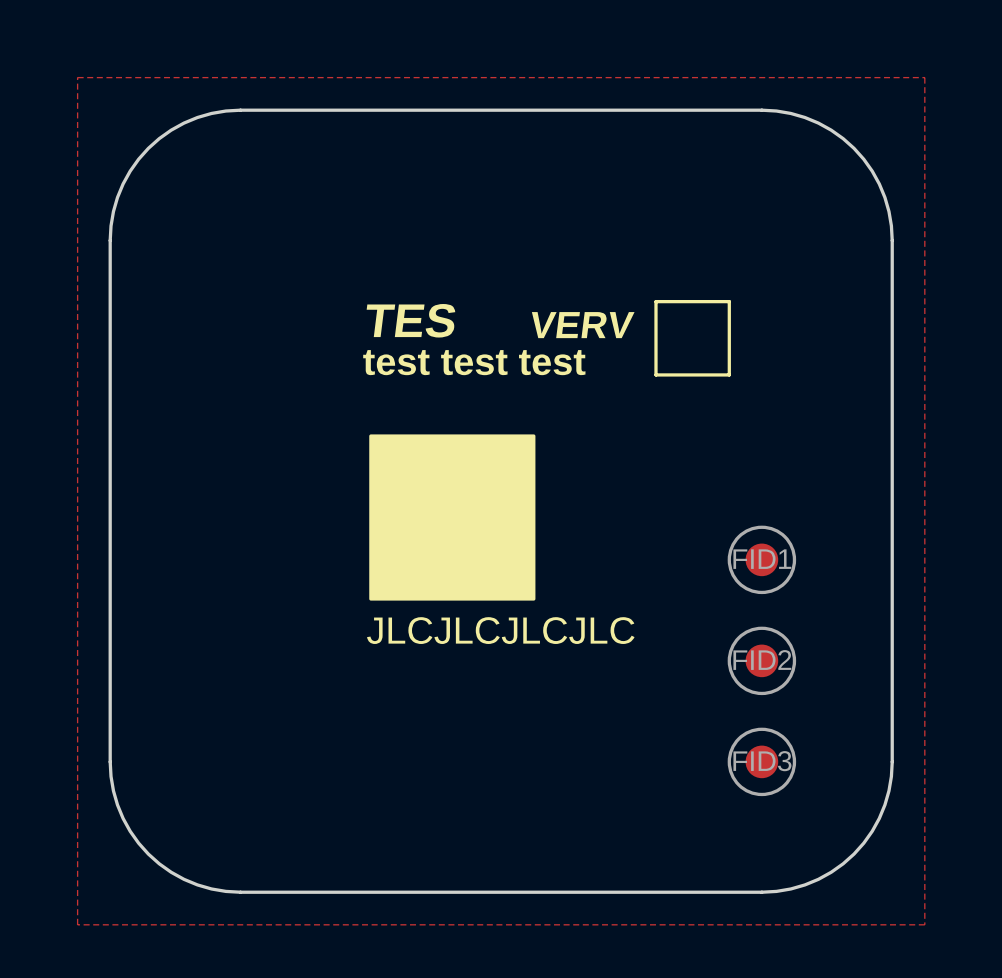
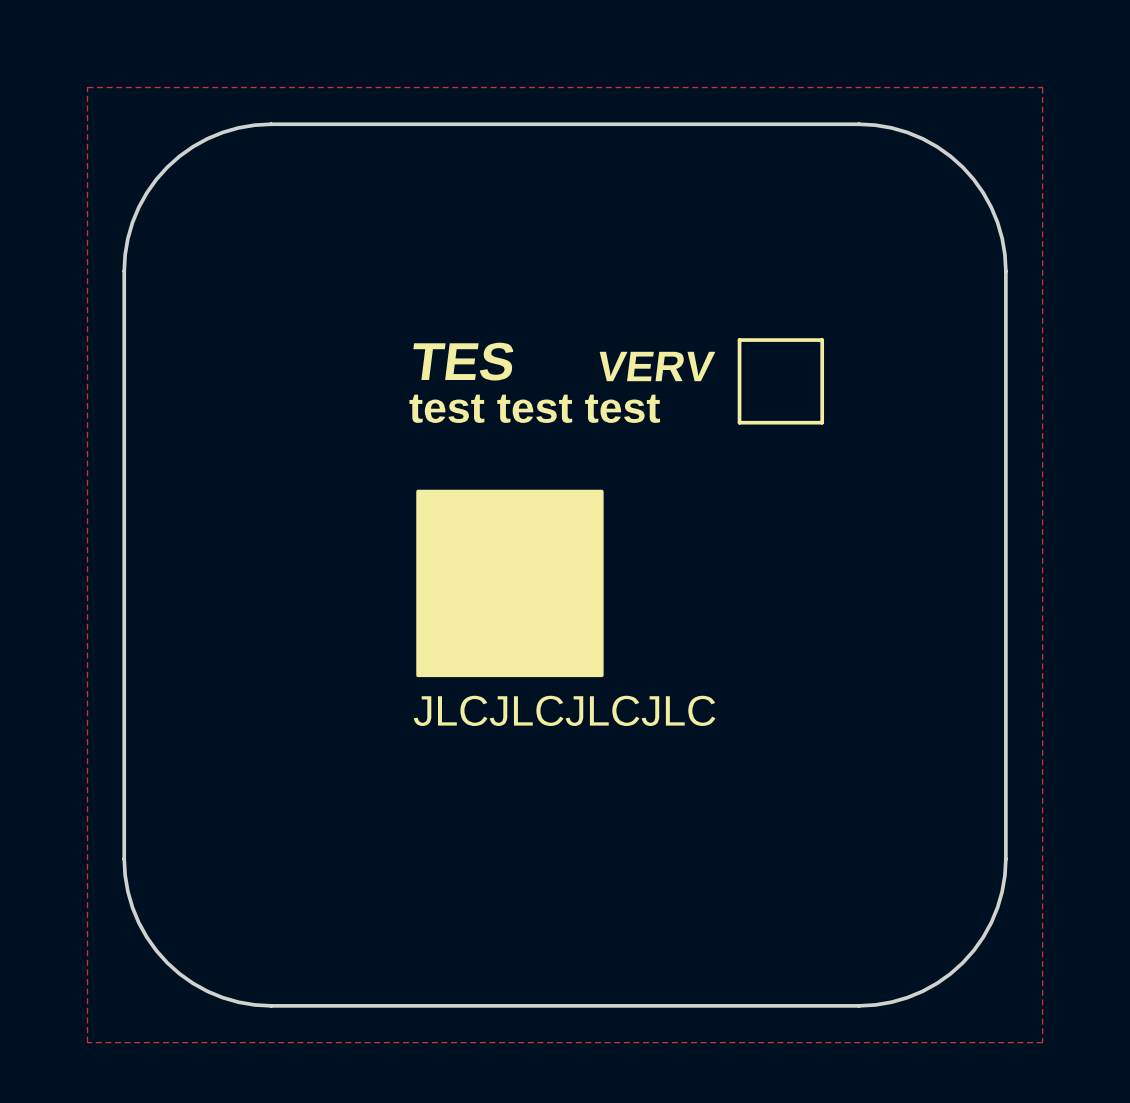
FID1: (761, 559) -> none
FID2: (761, 660) -> none
FID3: (761, 761) -> none

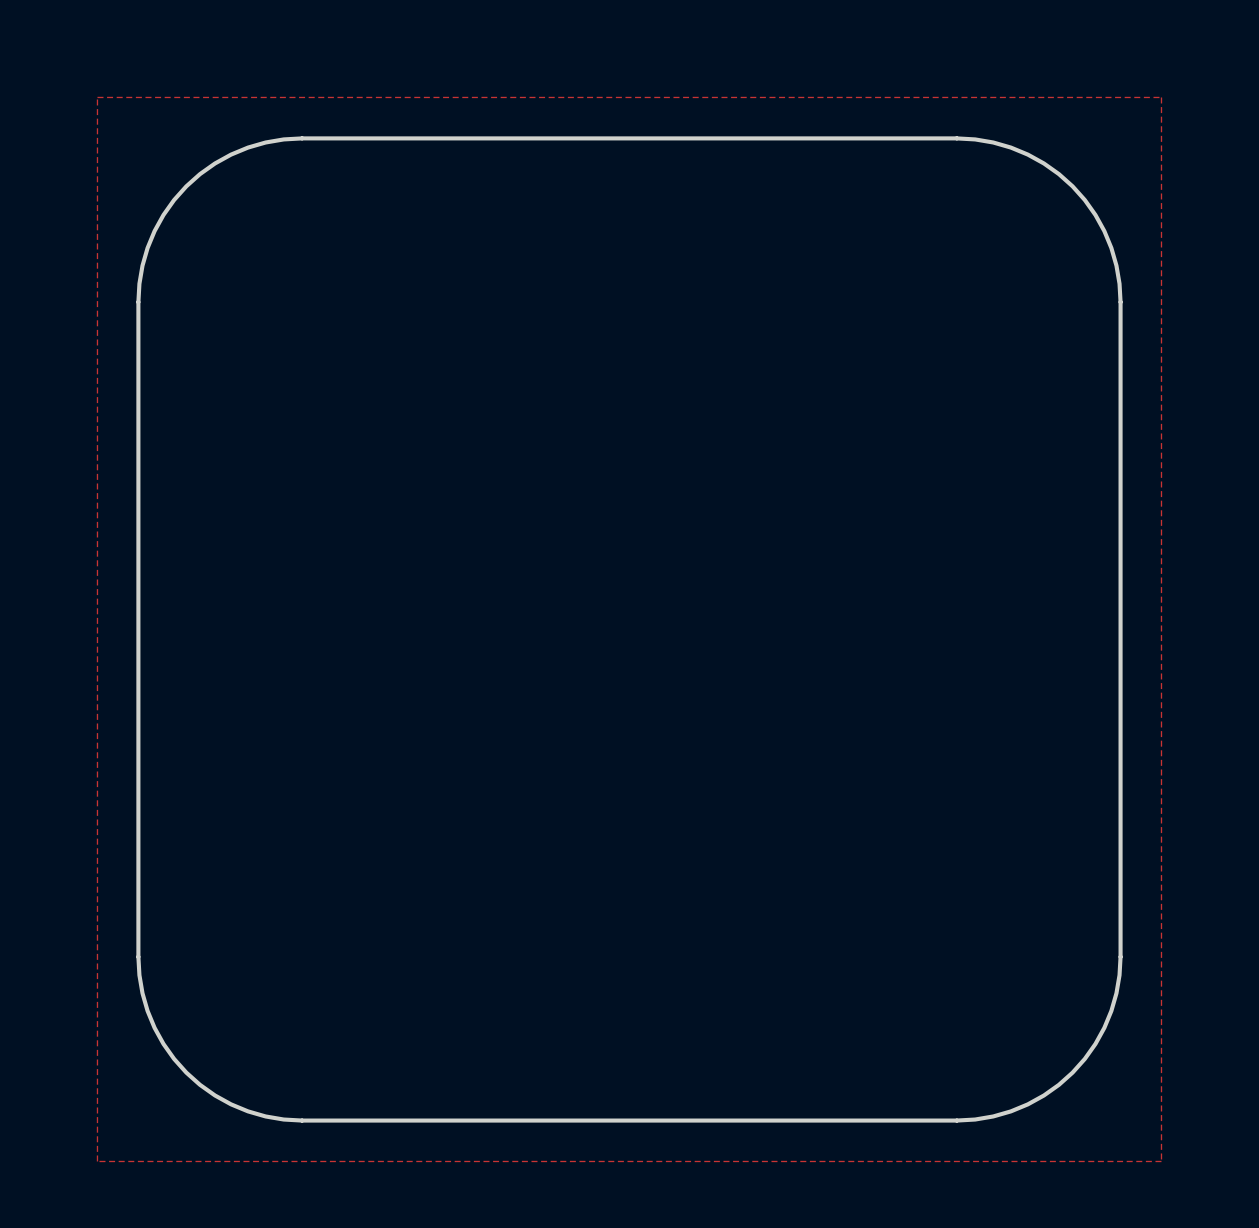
line: (739, 340) (739, 422) (822, 422) (822, 340) (739, 340) -> none
text: TES (463, 361) -> none
text: VERV (657, 366) -> none
text: test test test (534, 408) -> none
drawing: [416, 489, 604, 678] -> none
text: JLCJLCJLCJLC (564, 710) -> none

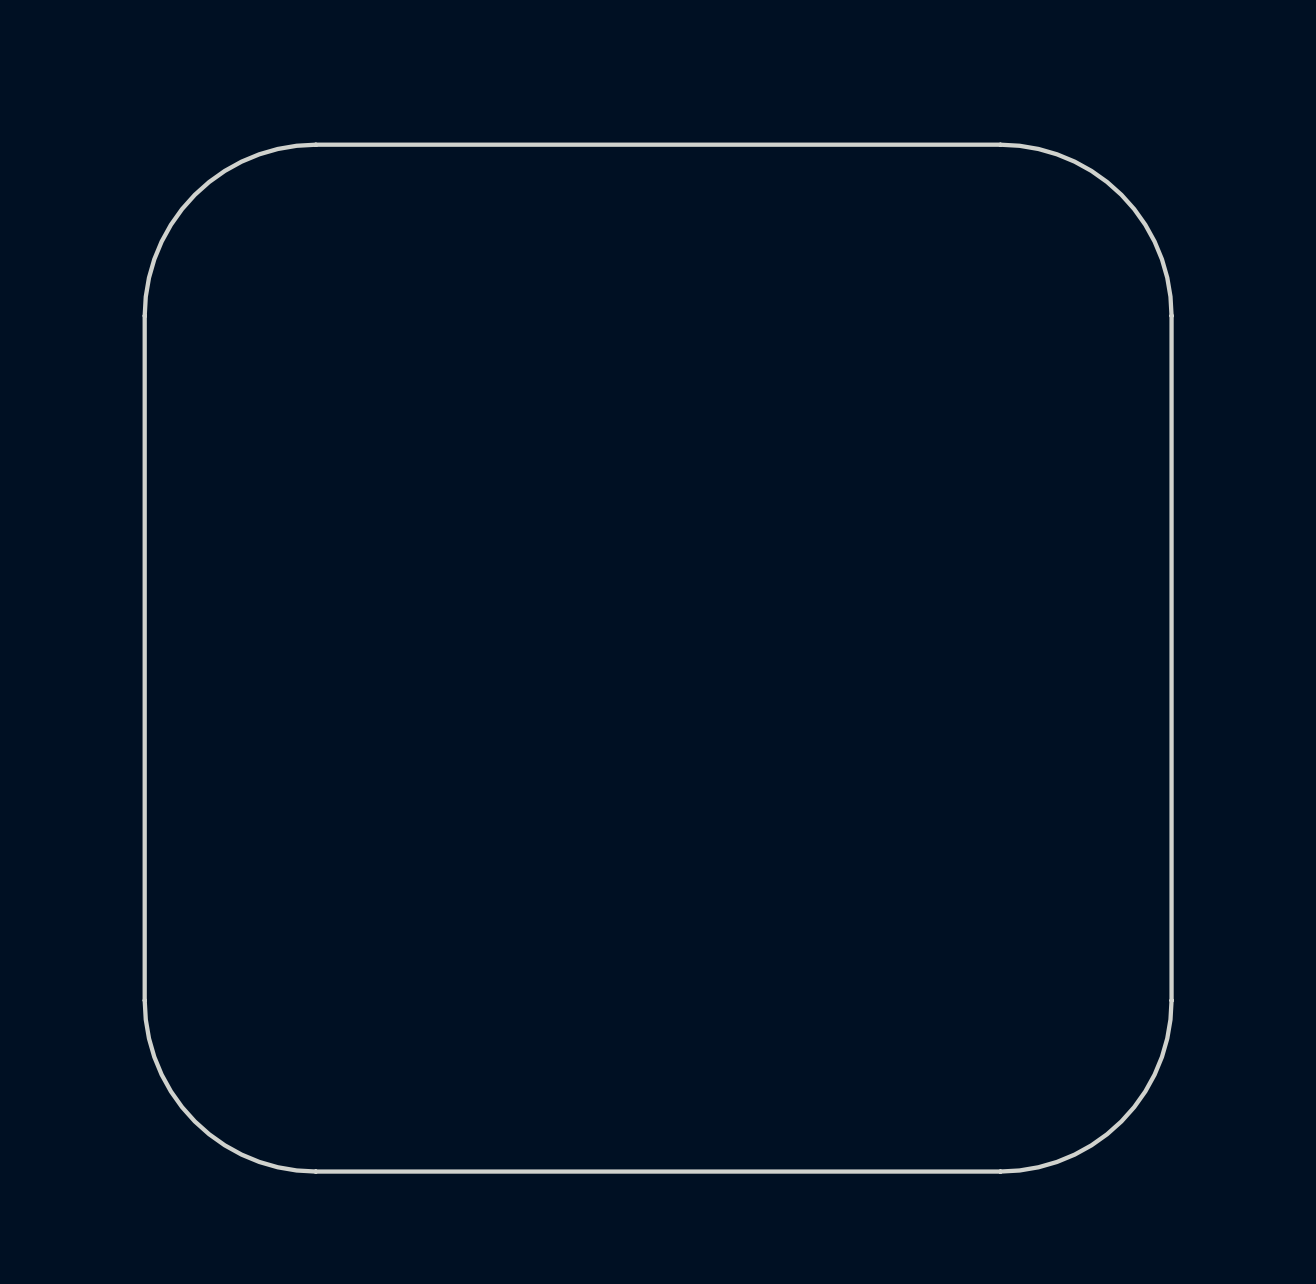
zone outline: (97, 97) (1161, 97) (1161, 1161) (97, 1161) (97, 97) -> none

